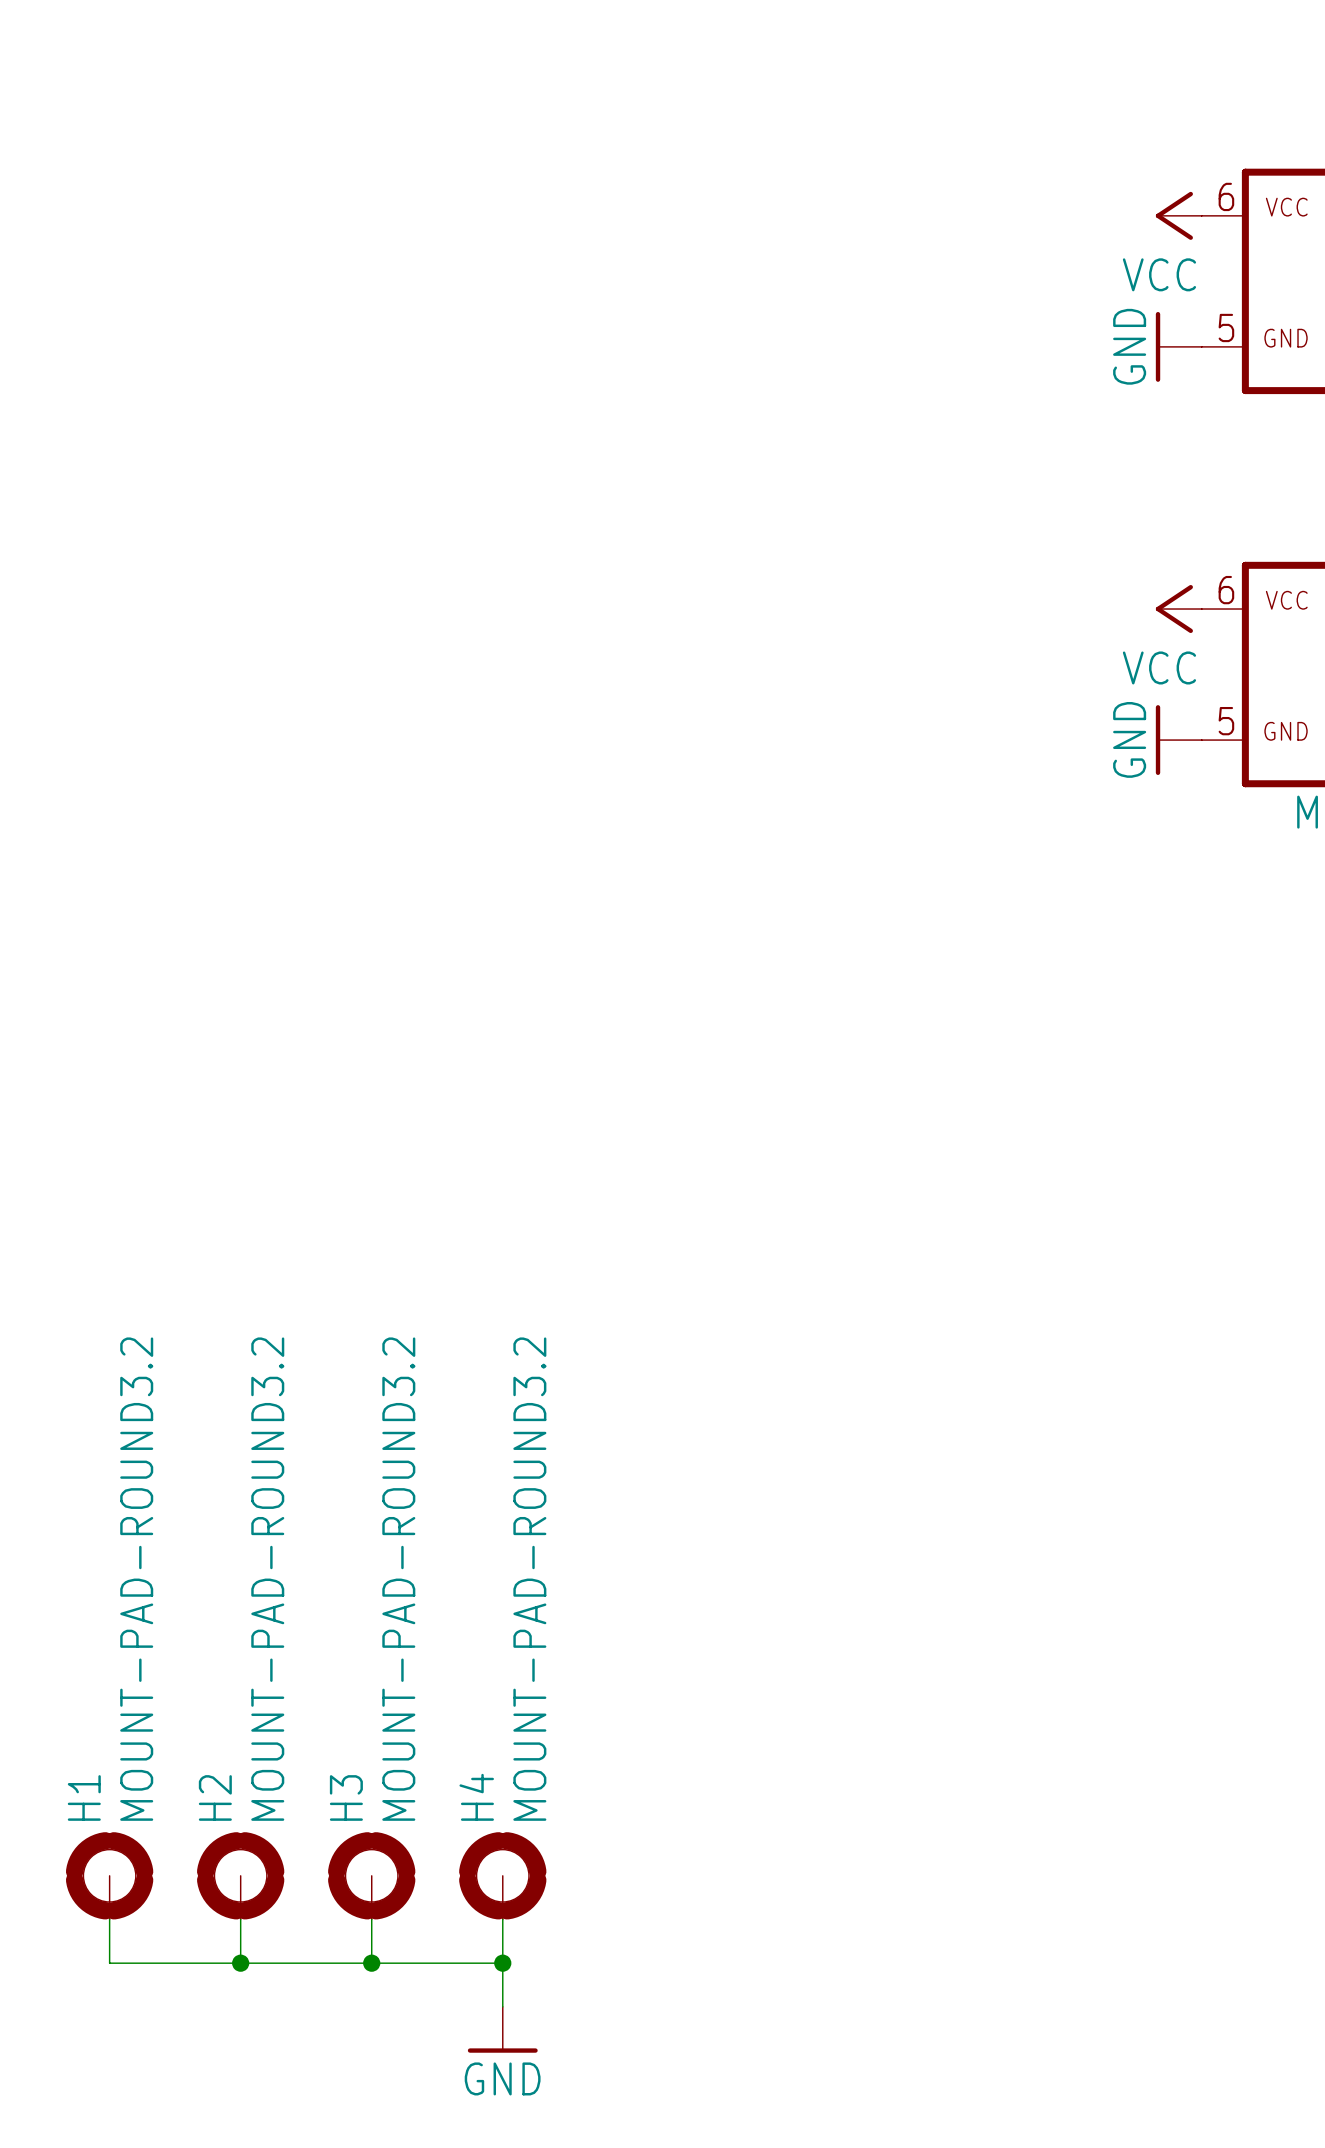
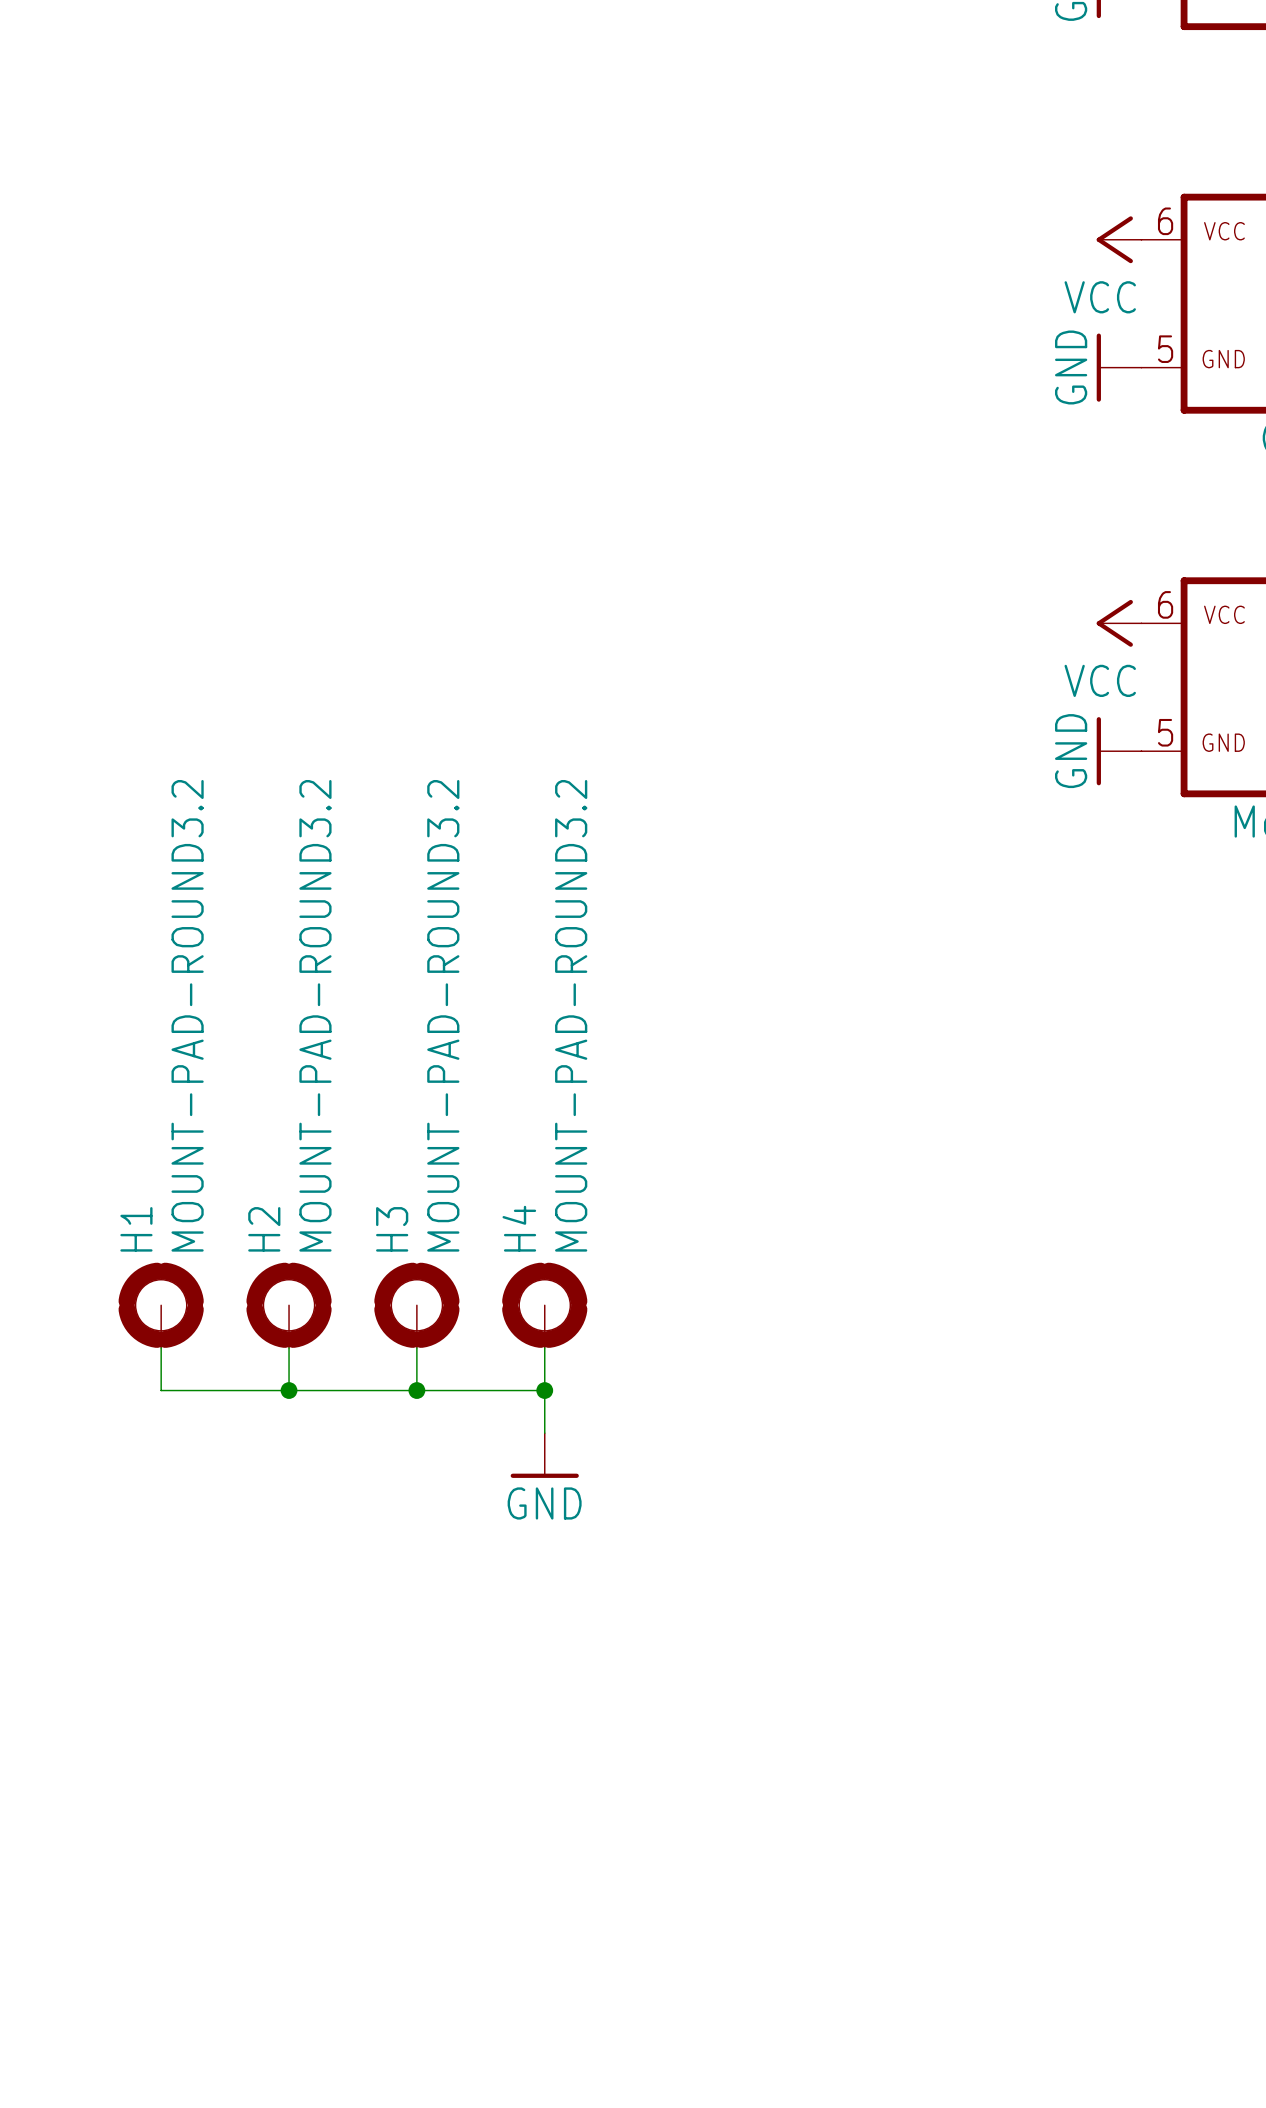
wire: none -> (161, 1347) (161, 1390) (544, 1390)
wire: none -> (289, 1347) (289, 1390)
wire: none -> (416, 1347) (416, 1390)
wire: none -> (544, 1347) (544, 1433)
junction: none -> (289, 1390)
junction: none -> (416, 1390)
junction: none -> (544, 1390)
power symbol: none -> GND (544, 1455)
H1 position: (109, 1875) -> (161, 1305)
H2 position: (240, 1875) -> (289, 1305)
H3 position: (371, 1875) -> (416, 1305)
H4 position: (502, 1875) -> (544, 1305)
wire: (109, 1919) (109, 1963) (502, 1963) -> none
wire: (240, 1919) (240, 1963) -> none
wire: (371, 1919) (371, 1963) -> none
wire: (502, 1919) (502, 2006) -> none
junction: (240, 1963) -> none
junction: (371, 1963) -> none
junction: (502, 1963) -> none
power symbol: GND (502, 2029) -> none

